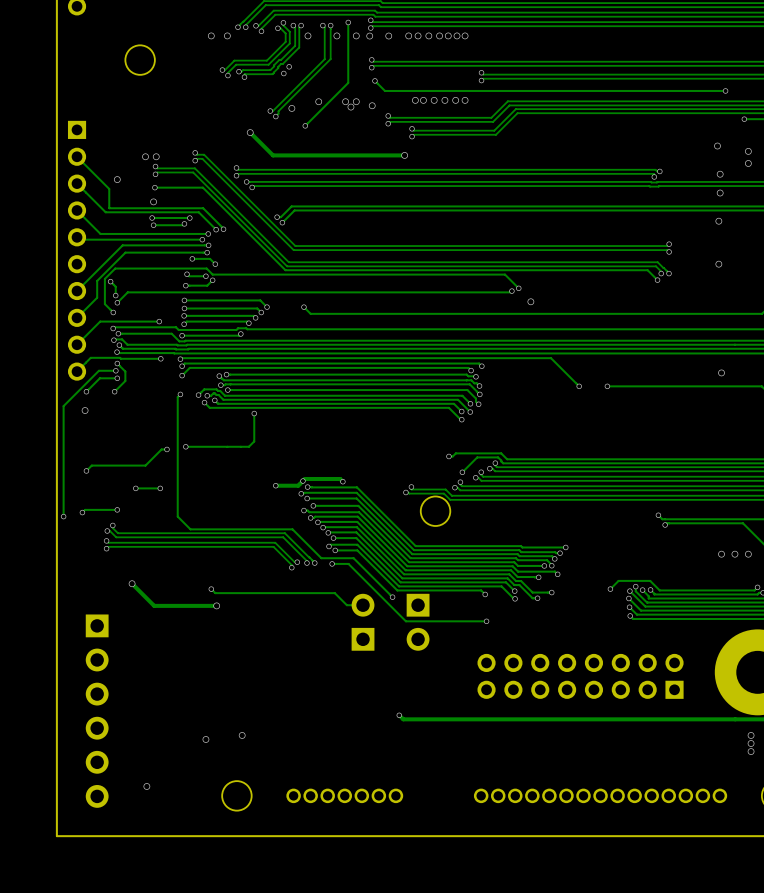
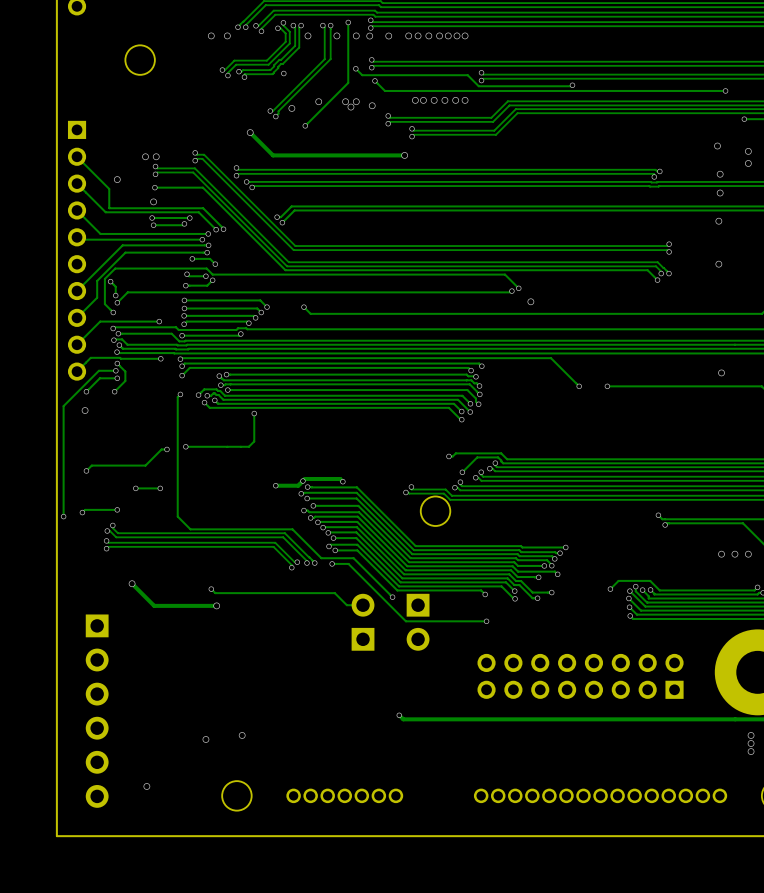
via position: (289, 66) -> (355, 68)
track: none -> (355, 68) (362, 75) (467, 75) (478, 86) (572, 85)
via: none -> (572, 85)

